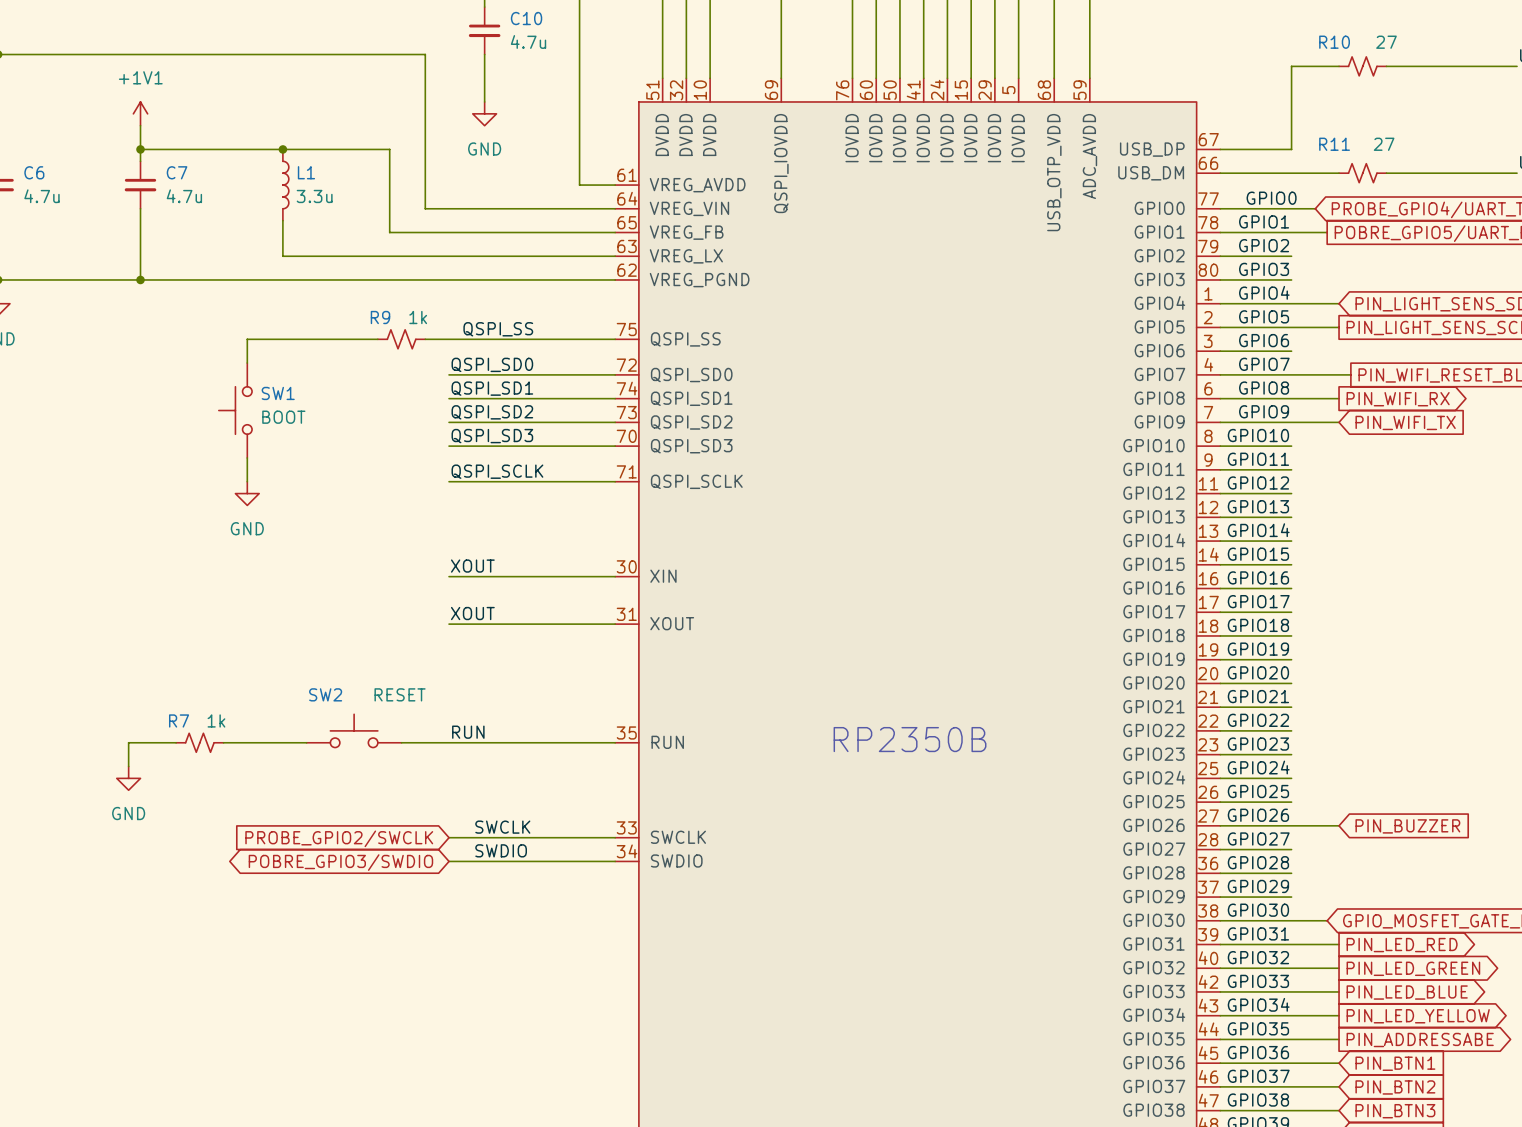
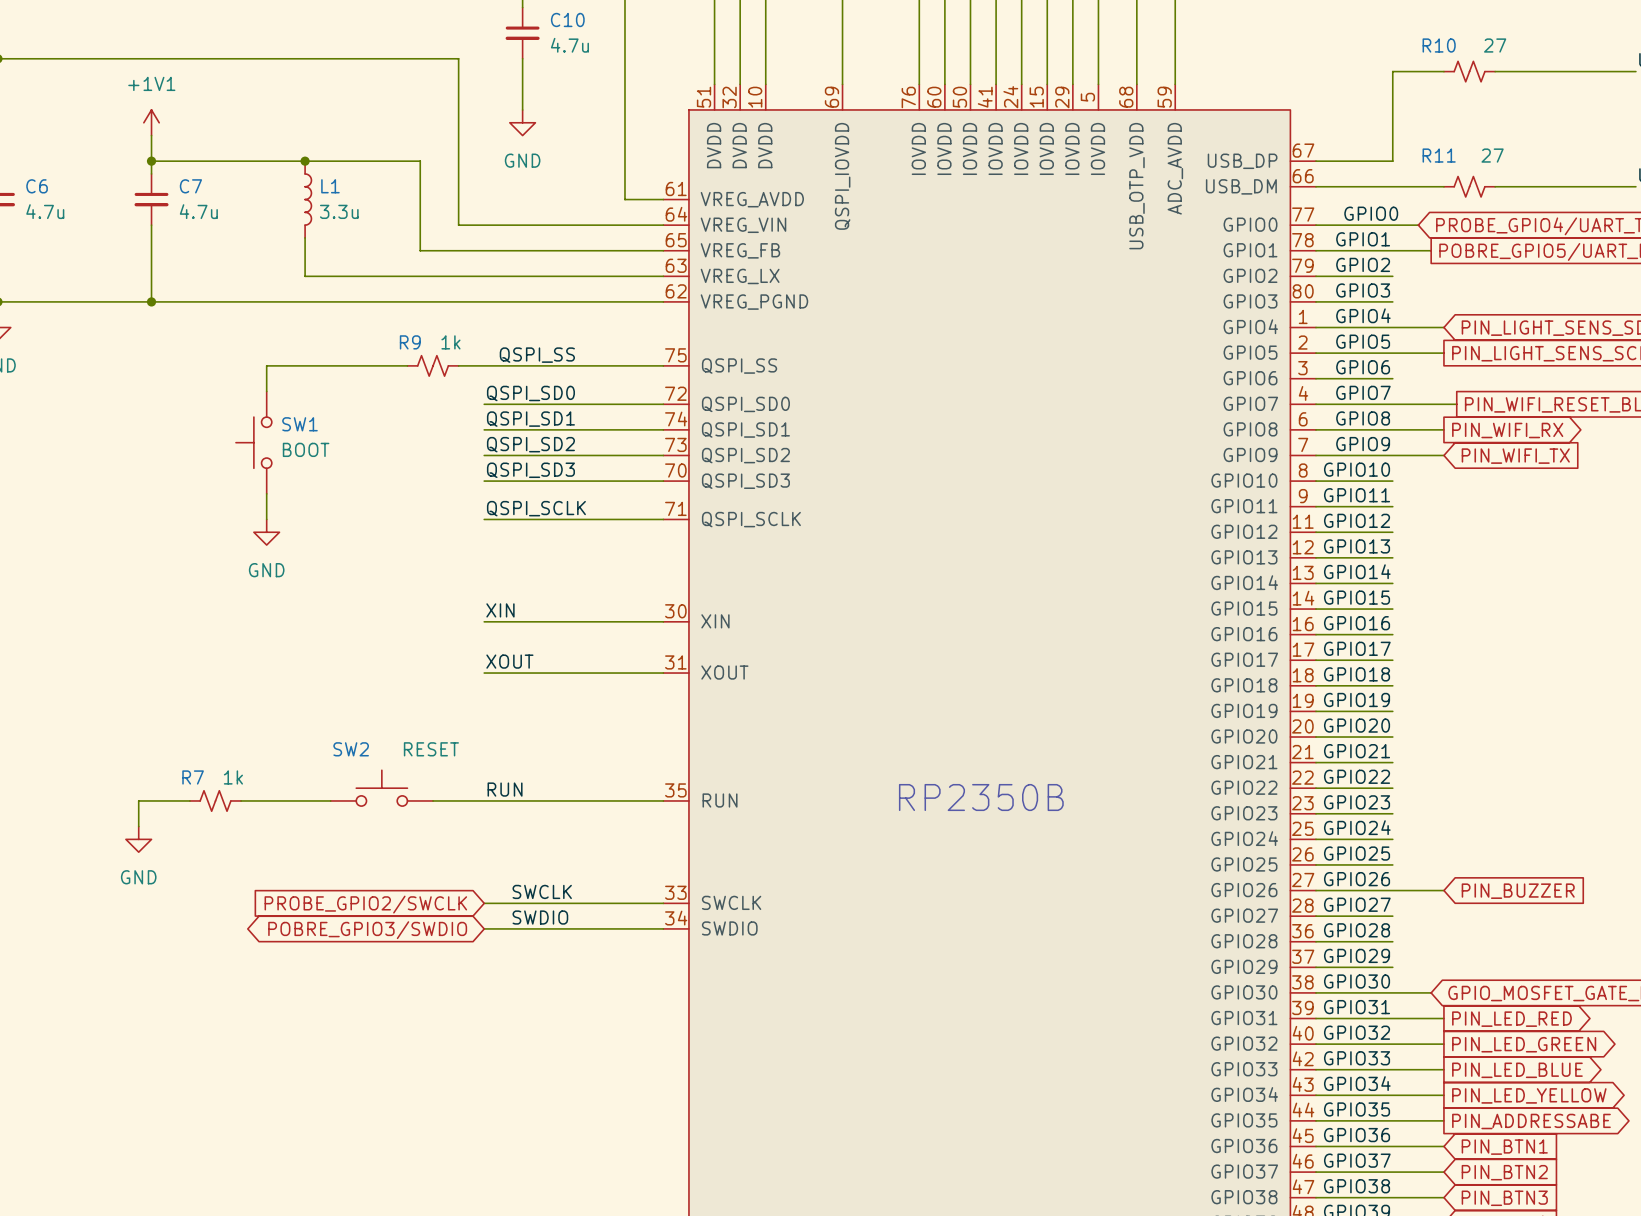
label: XOUT (472, 566) -> XIN (500, 610)

